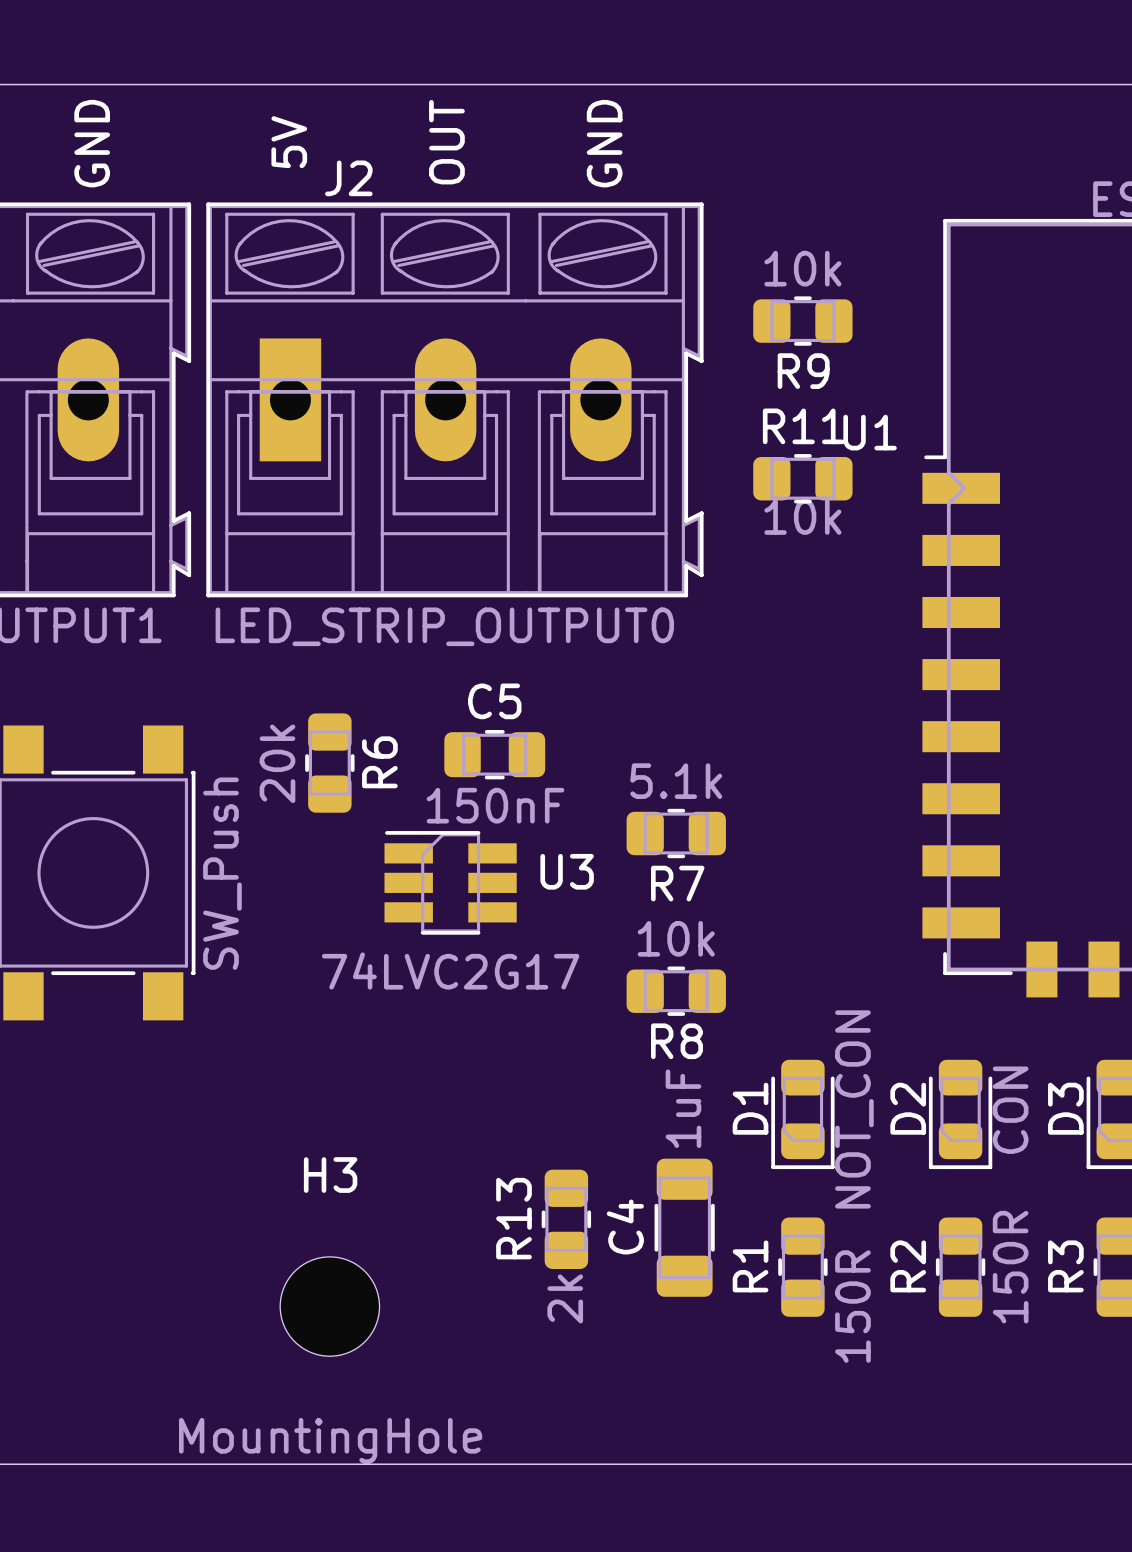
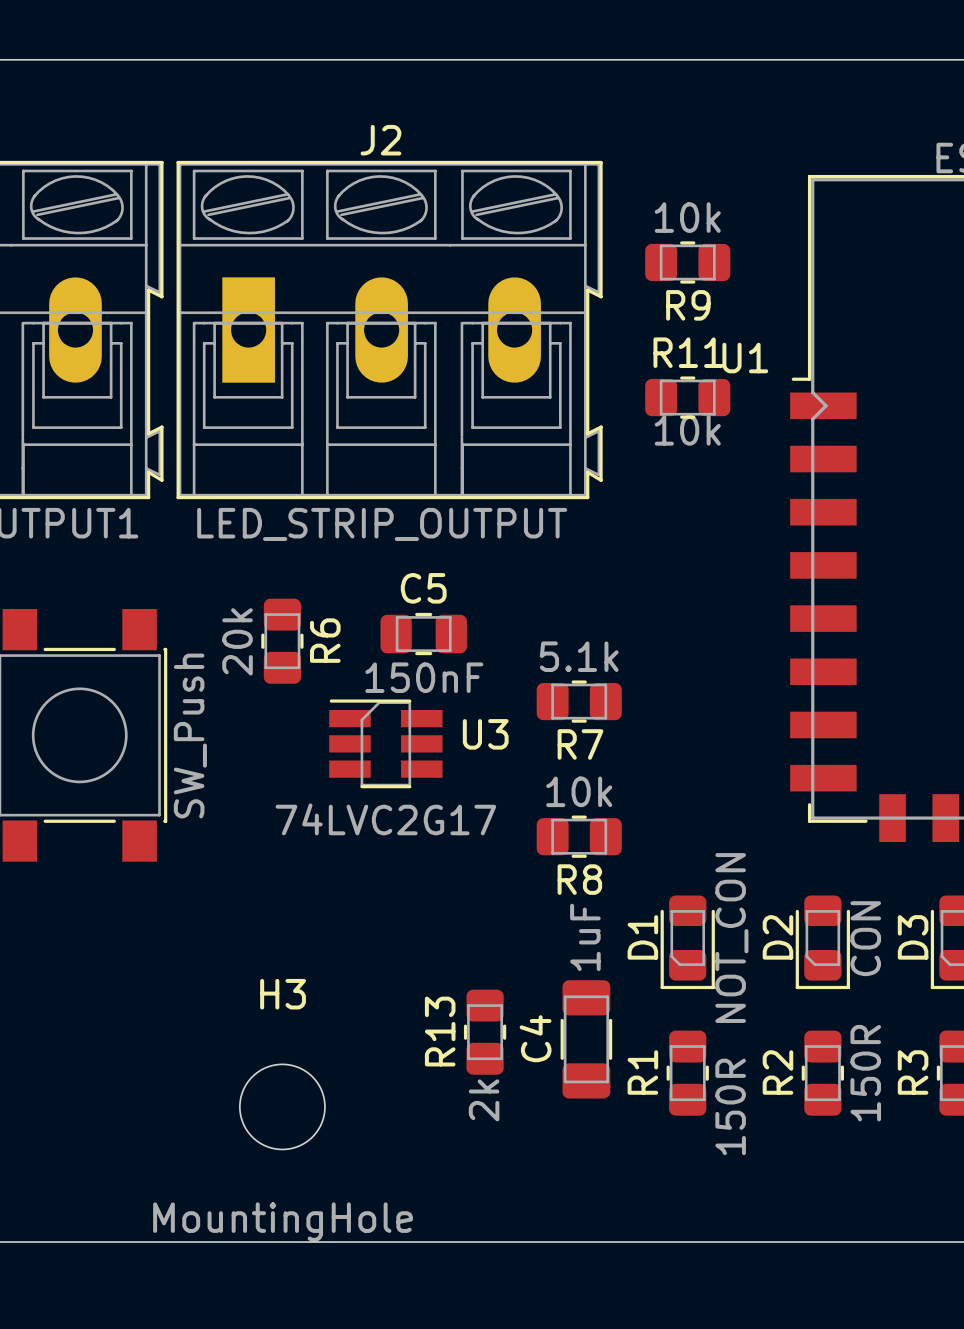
text: 5V (289, 142) -> none
text: OUT (446, 142) -> none
text: GND (92, 143) -> none
text: GND (604, 143) -> none
J2 name position: J2 (348, 178) -> J2 (380, 140)
J2 value: LED_STRIP_OUTPUT0 (444, 626) -> LED_STRIP_OUTPUT (382, 524)

